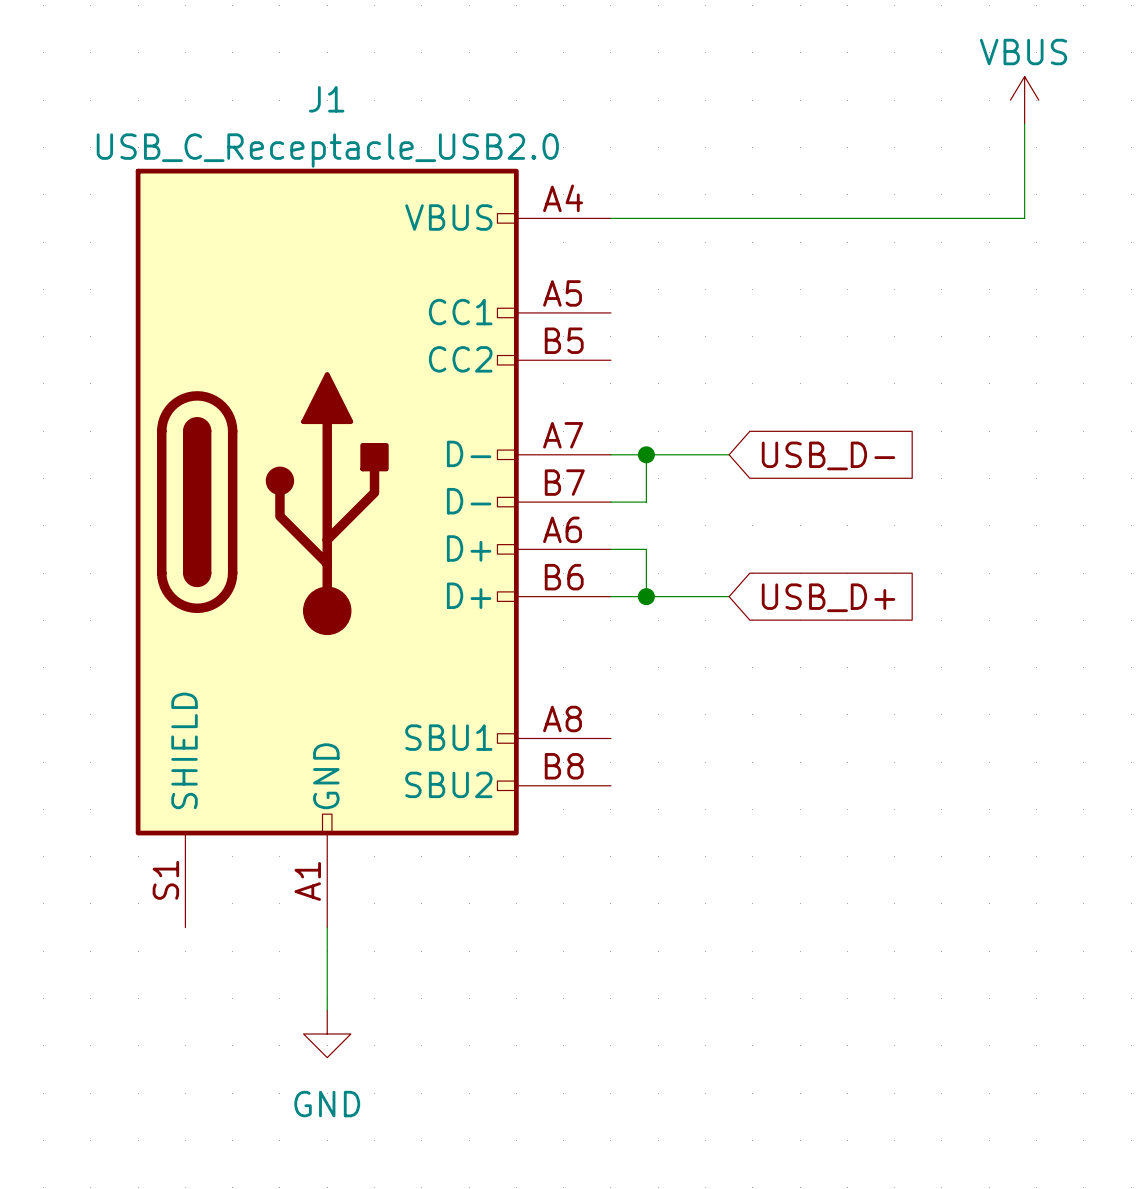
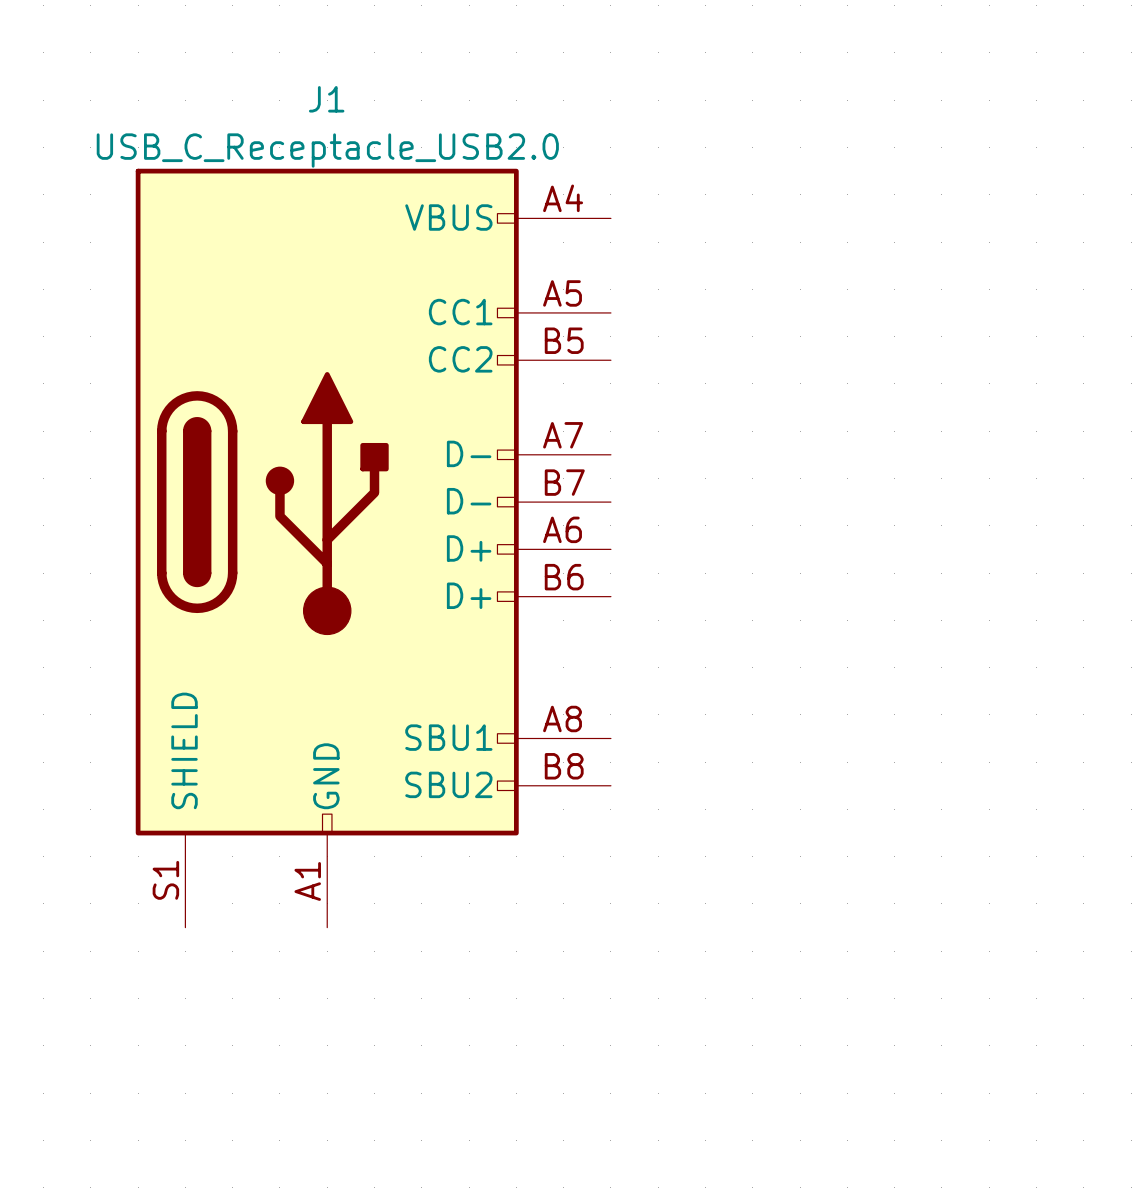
power symbol: VBUS (1024, 100) -> none
wire: (1024, 123) (1024, 218) (610, 218) -> none
wire: (610, 454) (729, 454) -> none
wire: (646, 454) (646, 502) (610, 502) -> none
junction: (646, 454) -> none
global label: USB_D- (828, 455) -> none
wire: (610, 549) (646, 549) (646, 596) -> none
wire: (610, 596) (729, 596) -> none
junction: (646, 596) -> none
global label: USB_D+ (828, 597) -> none
wire: (327, 927) (327, 1010) -> none
power symbol: GND (327, 1034) -> none

